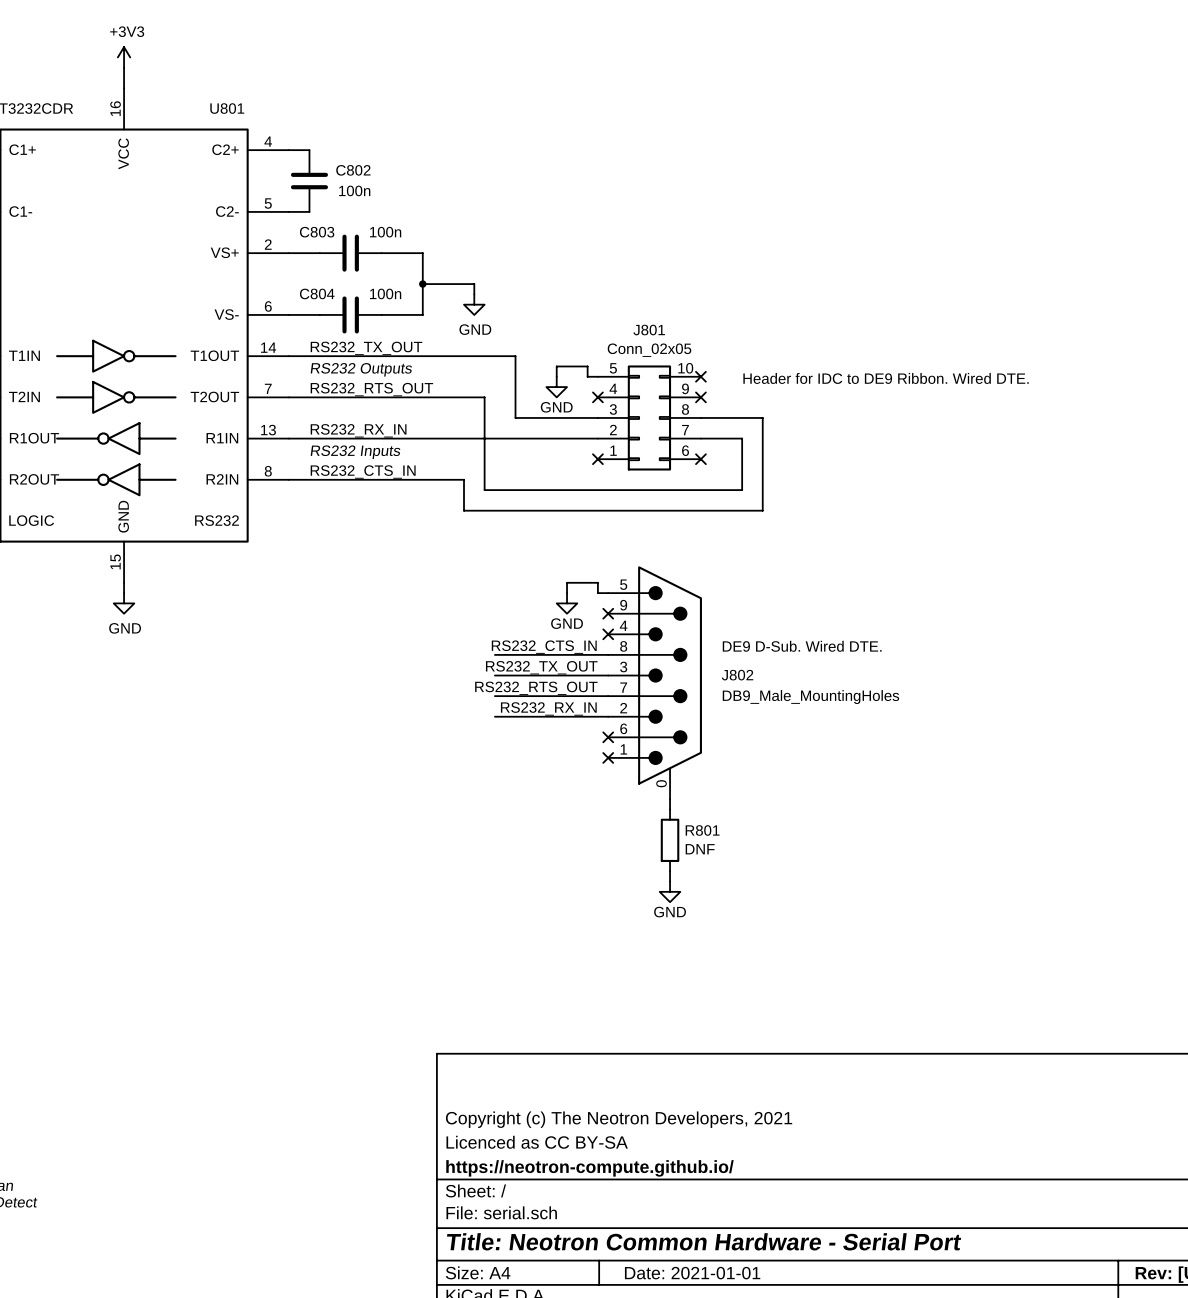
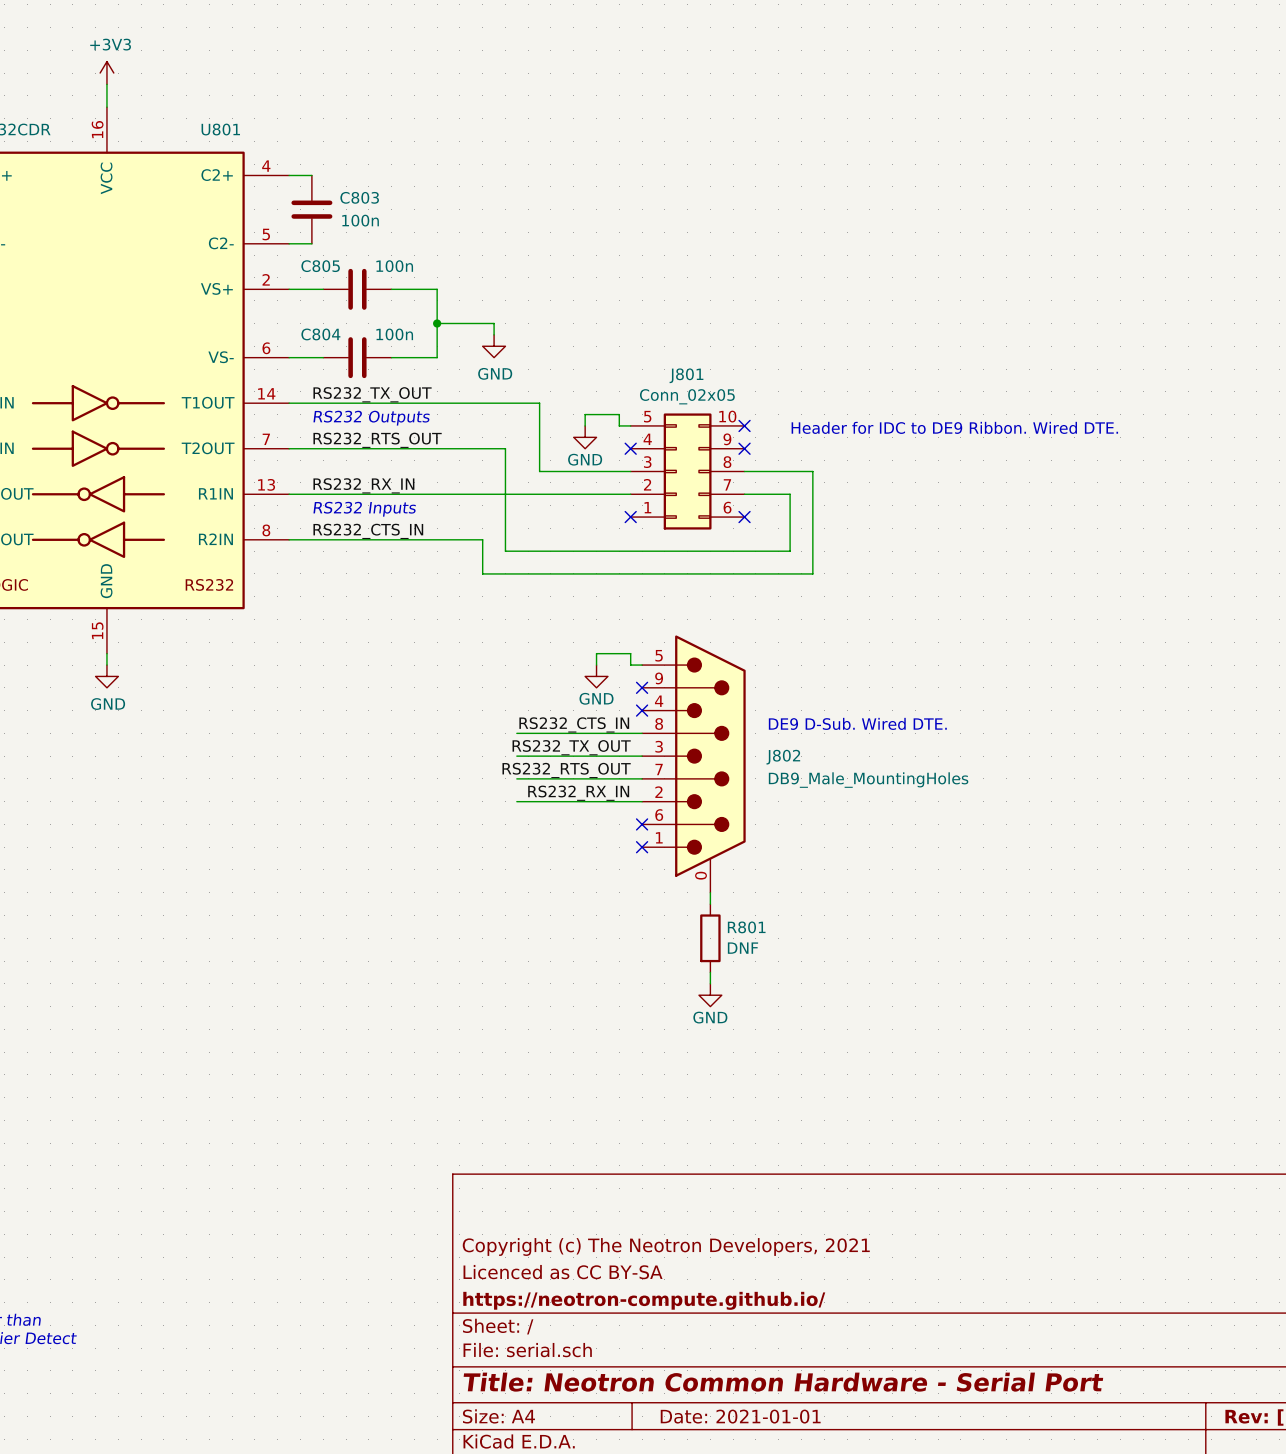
C802 name: C802 (353, 170) -> C803 (359, 197)
C803 name: C803 (317, 232) -> C805 (320, 266)

